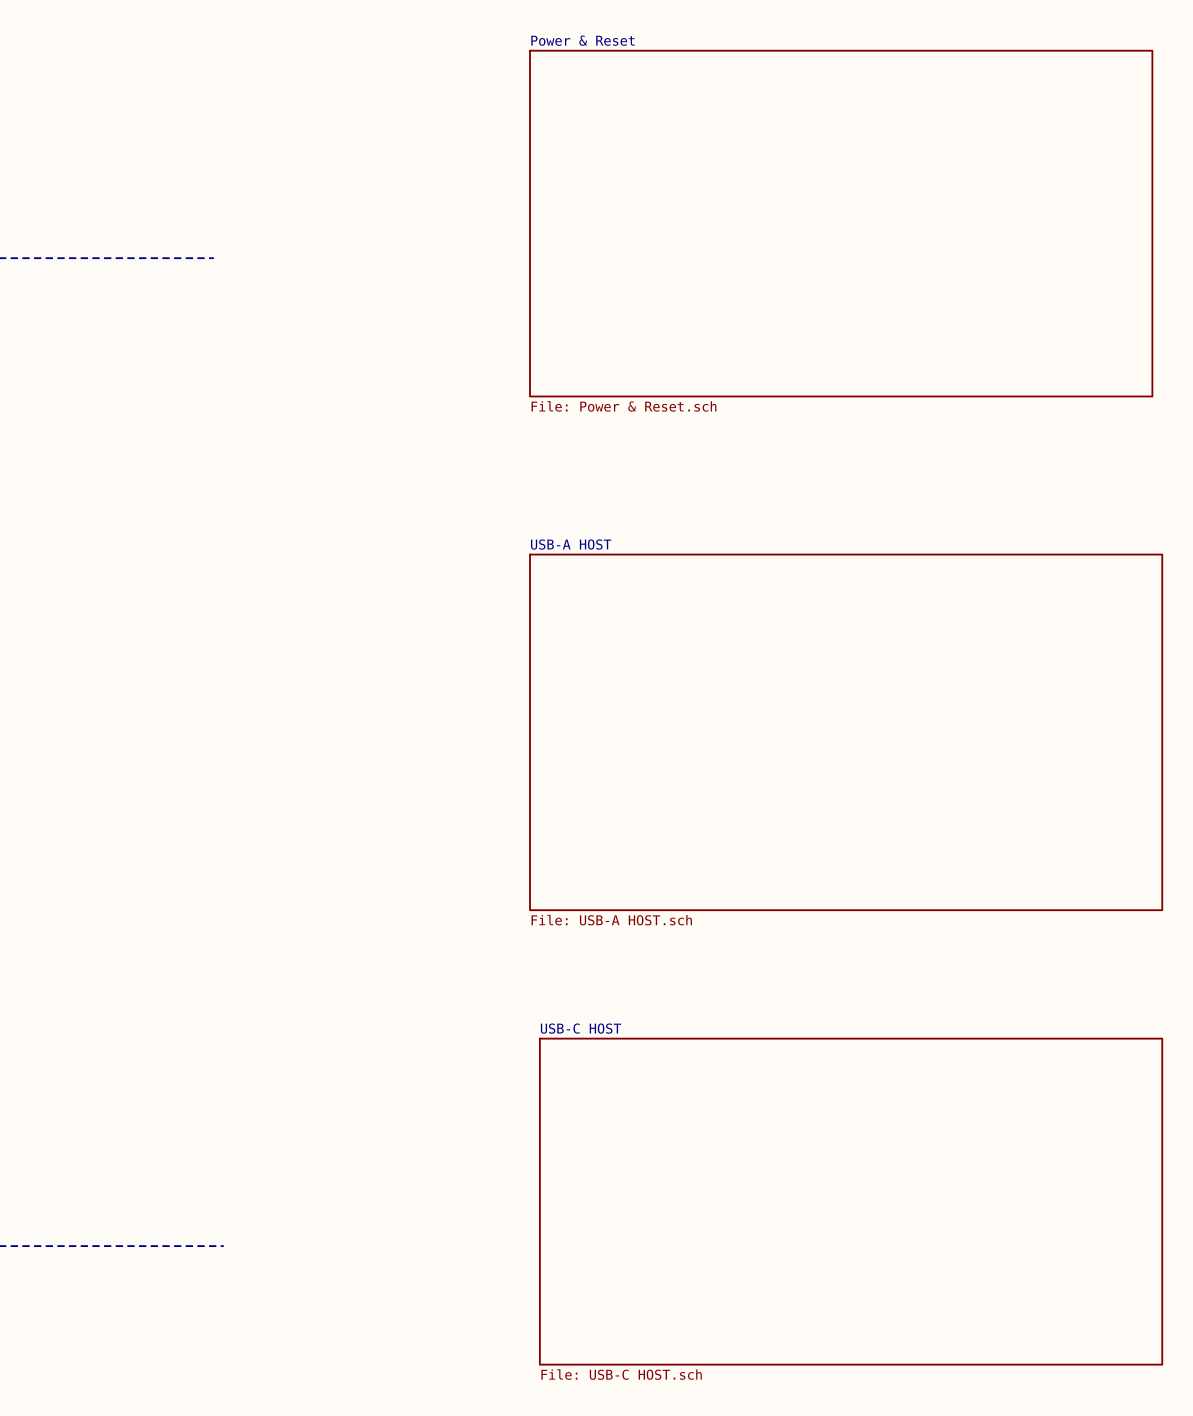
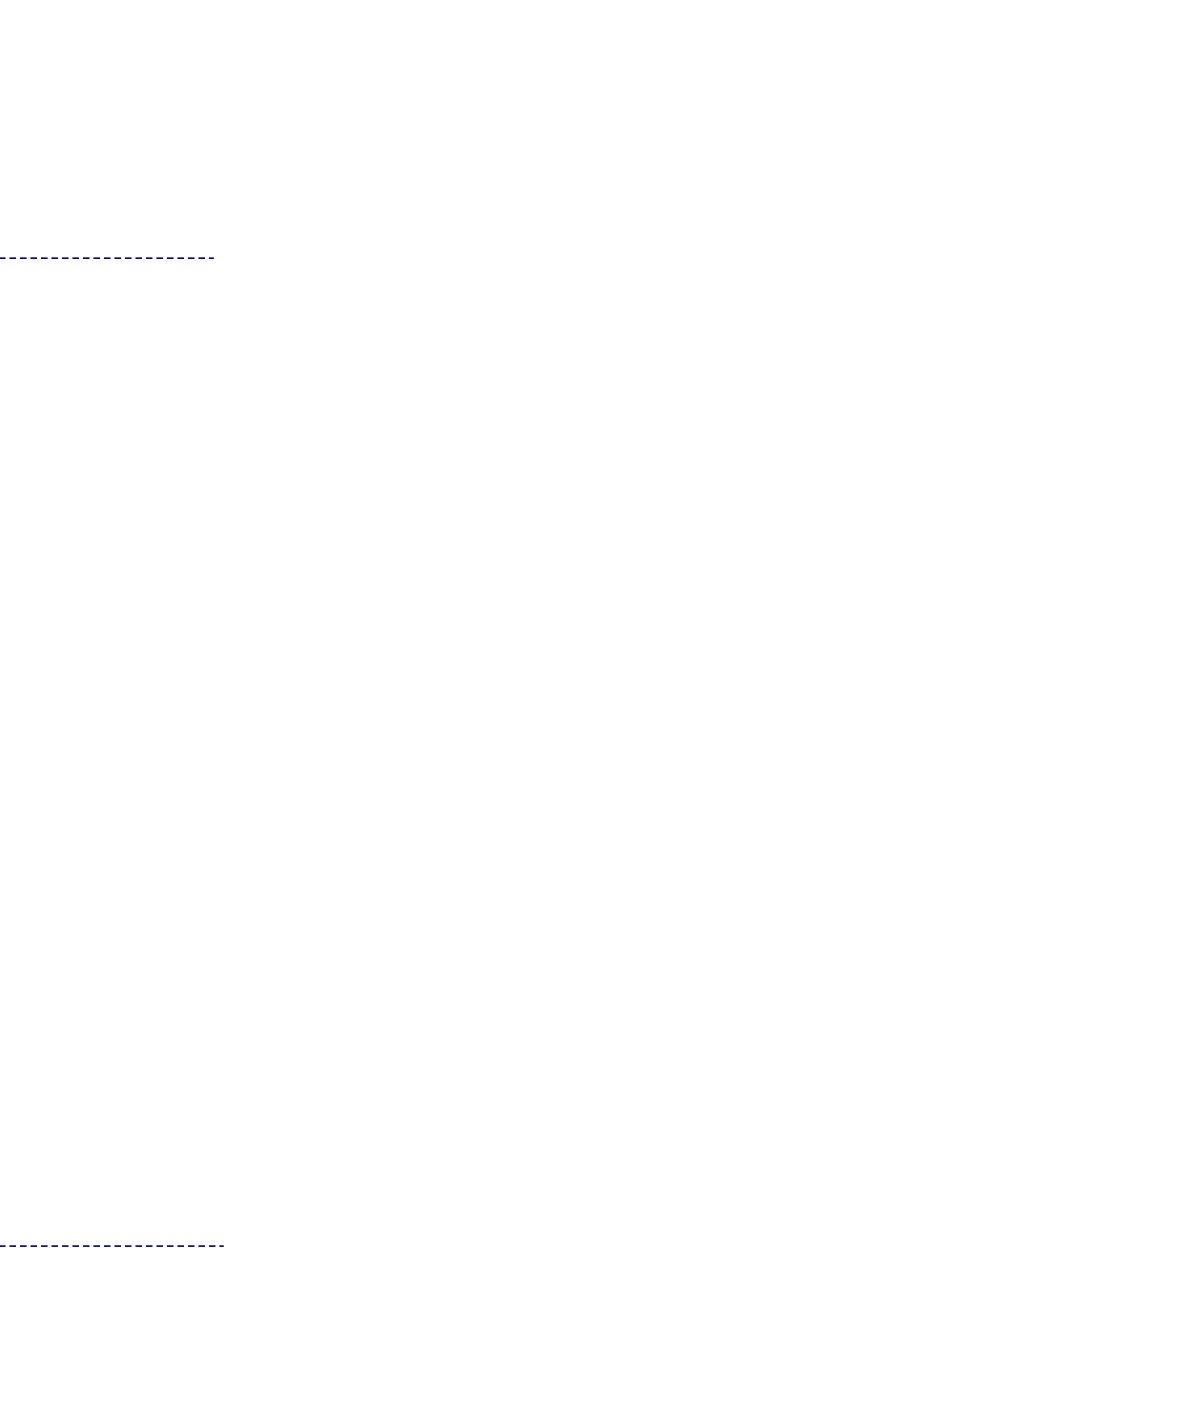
sheet Power & Reset: File: Power & Reset.sch (841, 223) -> none
sheet USB-A HOST: File: USB-A HOST.sch (846, 732) -> none
sheet USB-C HOST: File: USB-C HOST.sch (851, 1201) -> none

